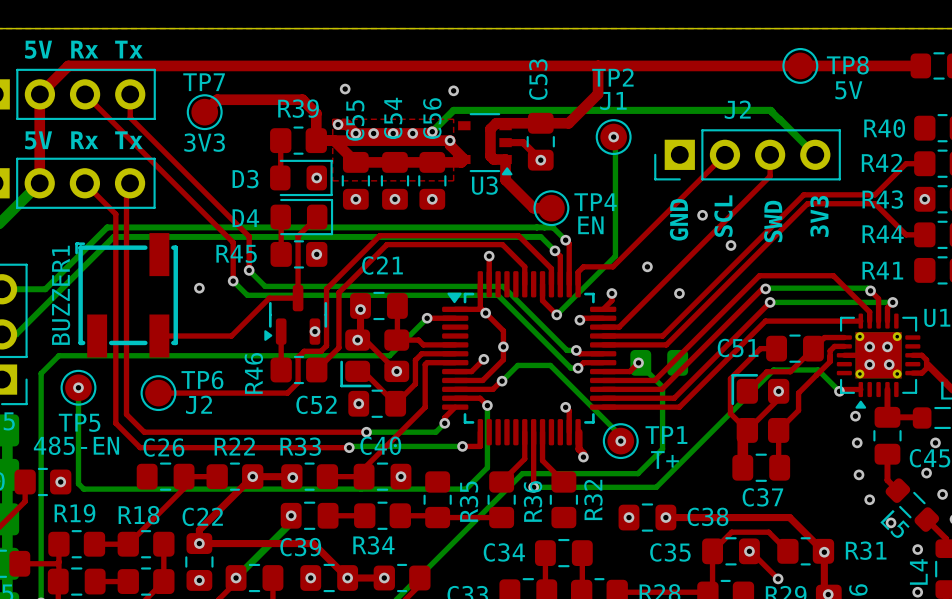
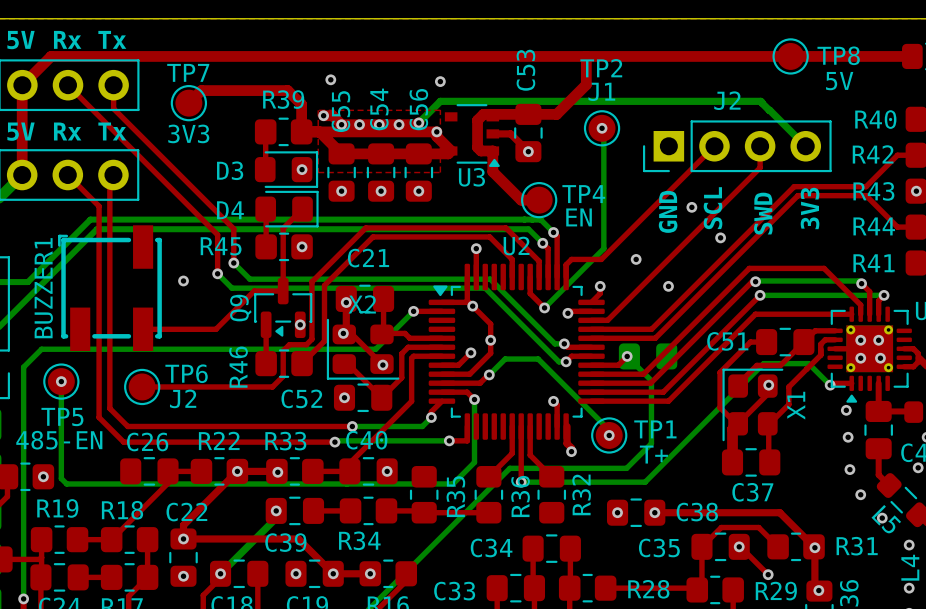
part: (295, 314) -> none
Q9: none -> (283, 307)
X2: none -> (363, 349)
part: (374, 358) -> none
part: (529, 358) -> none
U2: none -> (516, 351)
part: (760, 408) -> none
X1: none -> (752, 404)

